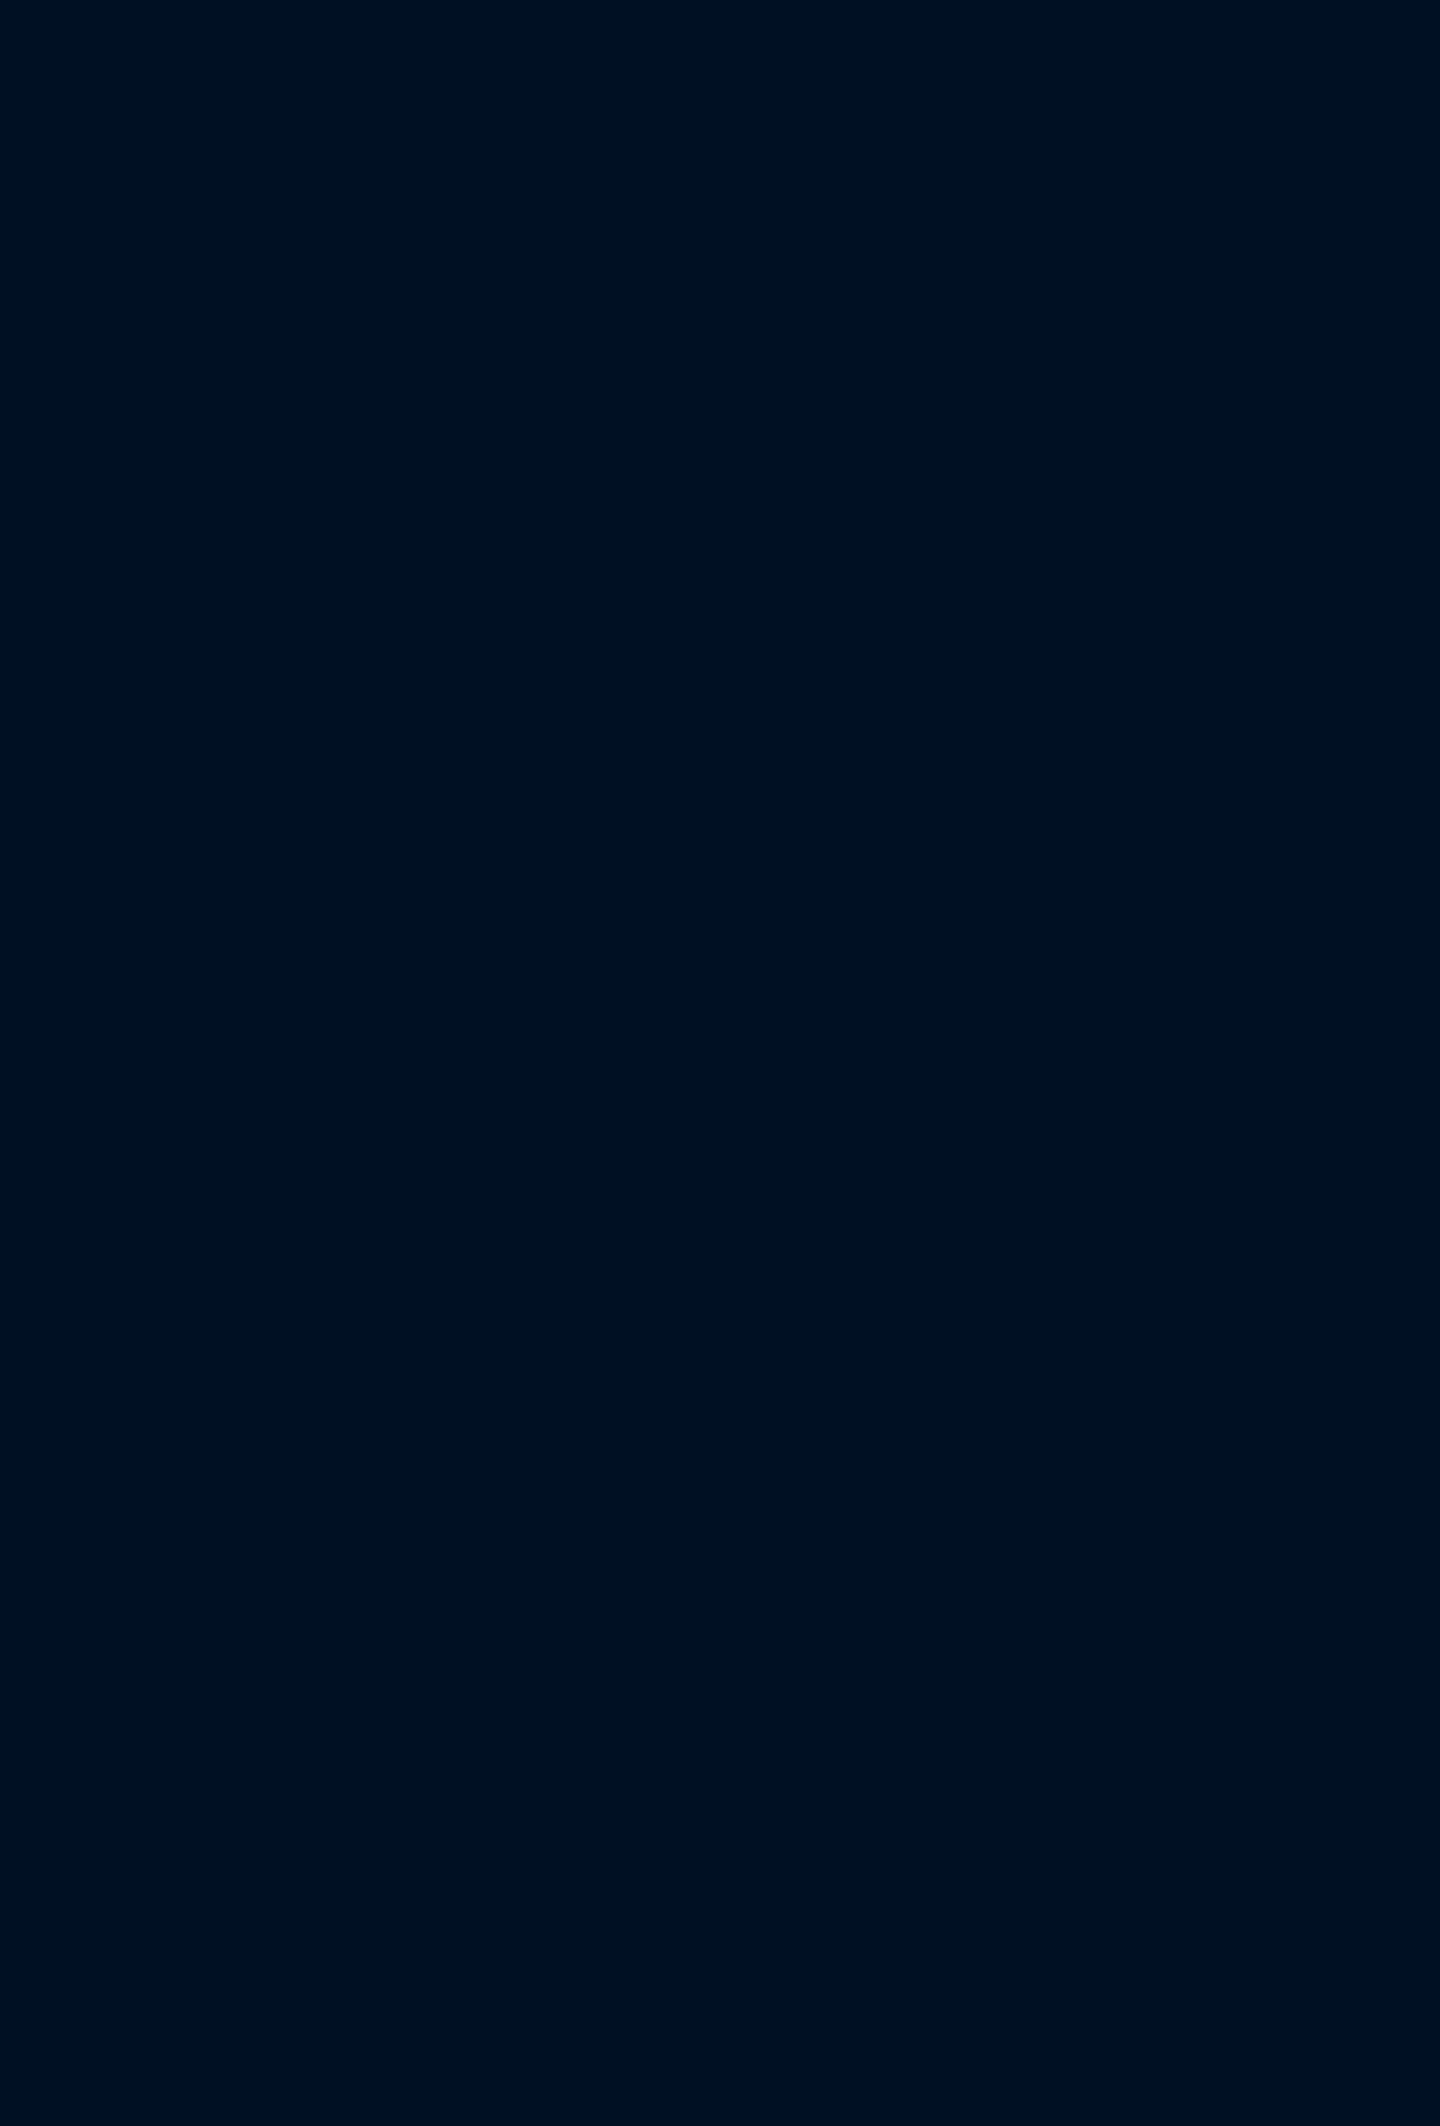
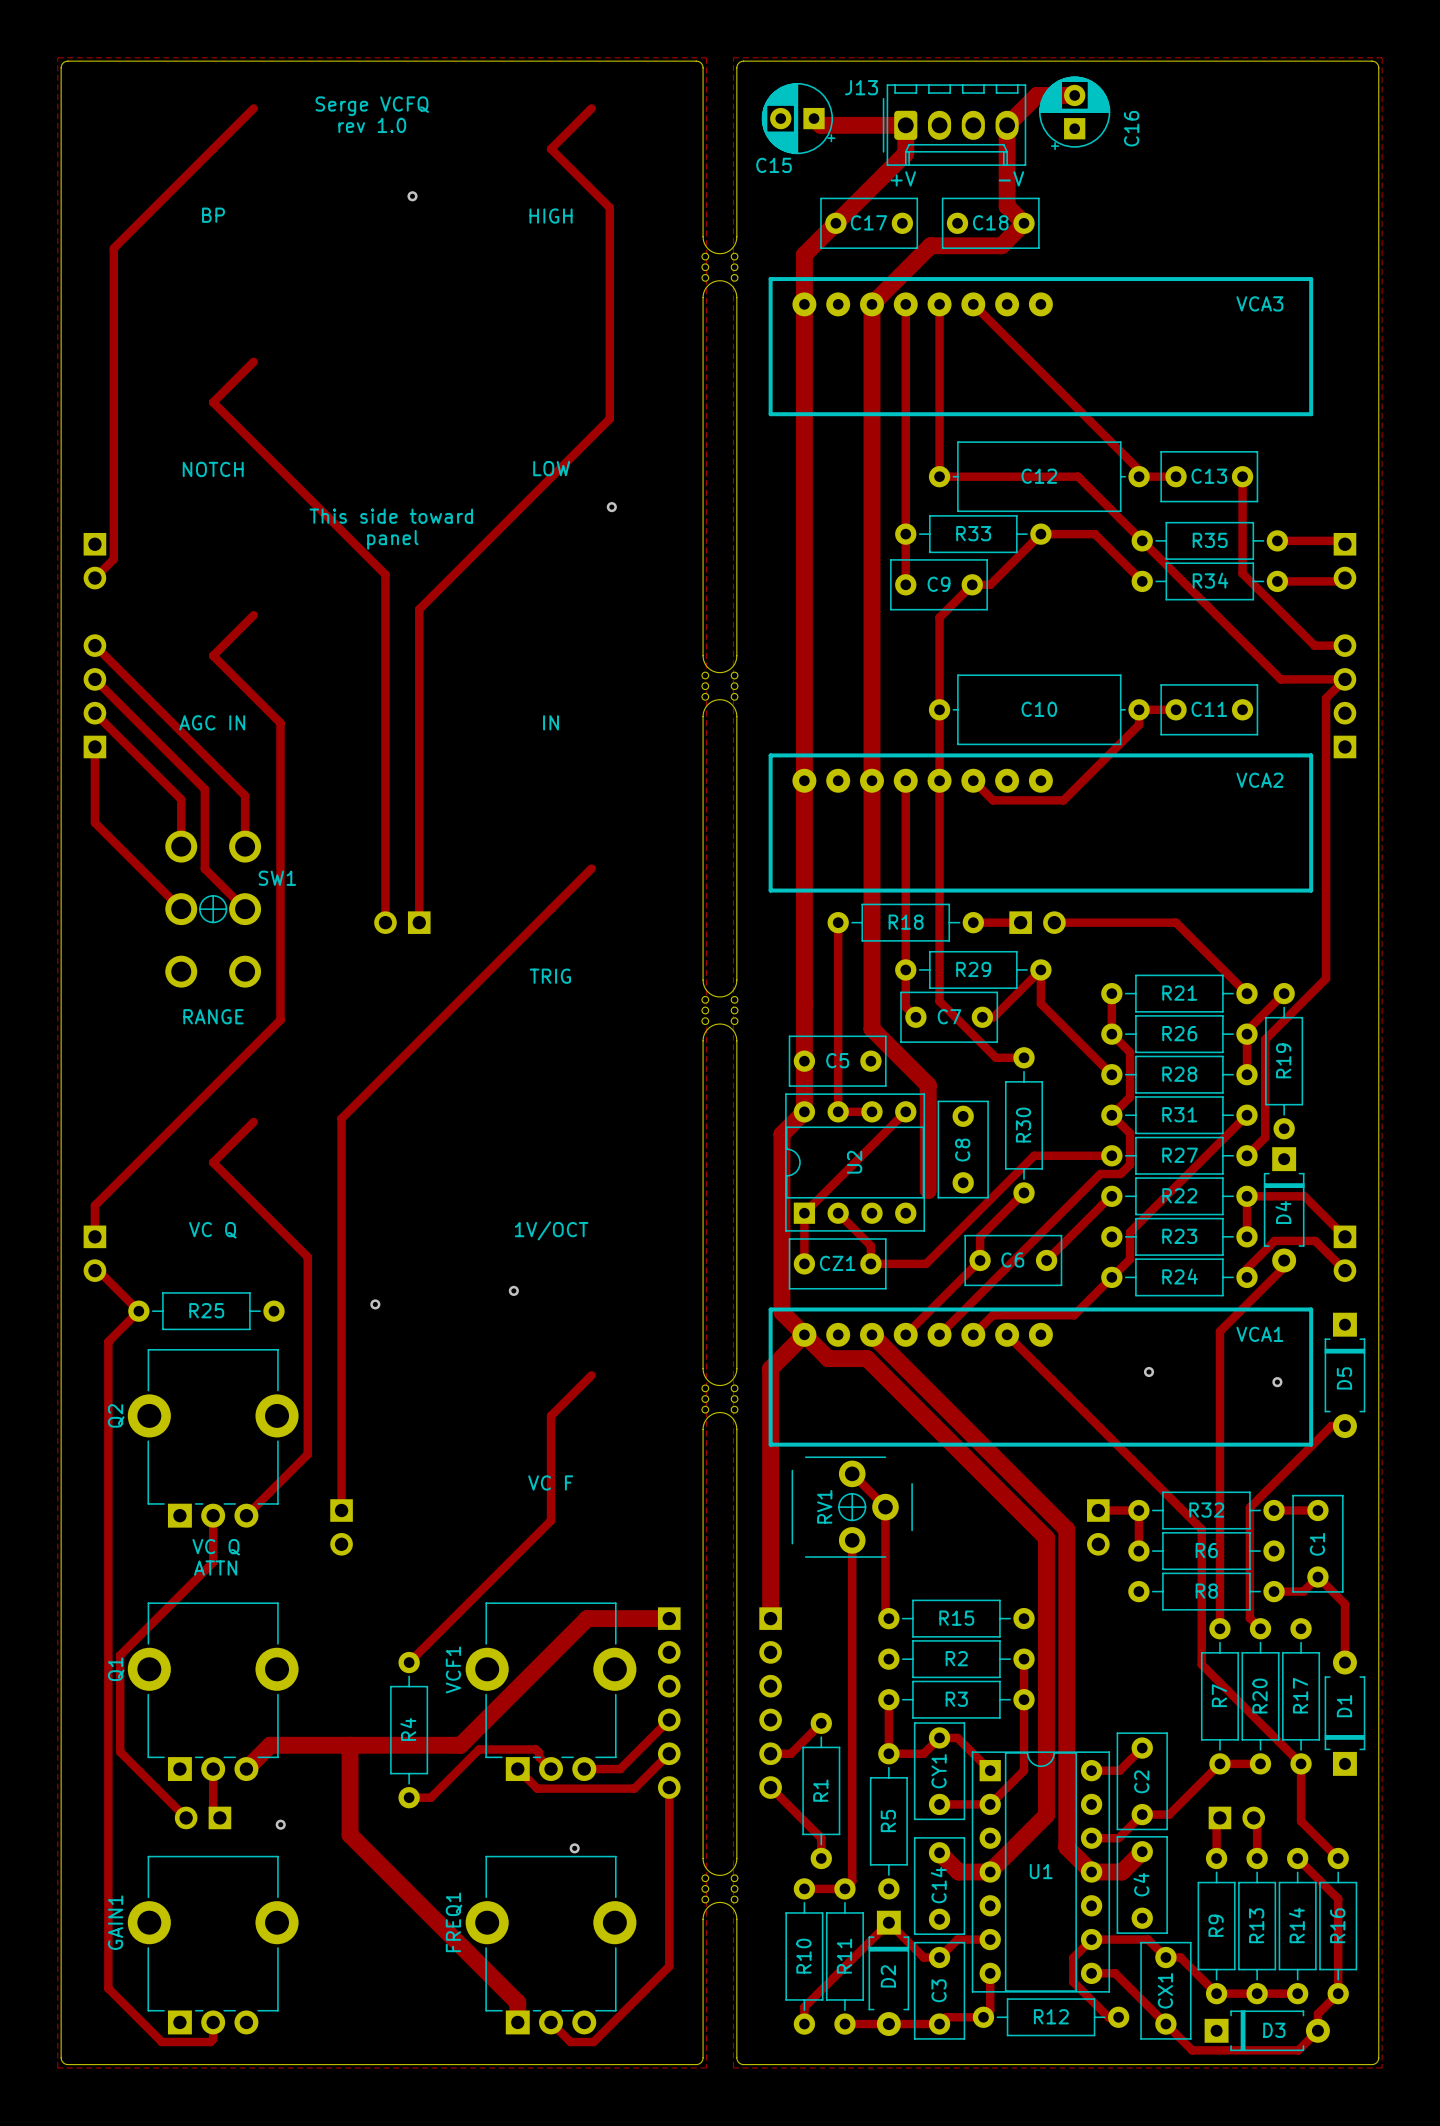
zone outline: none -> (57, 57) (706, 57) (706, 2067) (57, 2067) (57, 57)
zone outline: none -> (733, 57) (733, 2067) (1382, 2067) (1382, 57) (733, 57)
board edge: none -> (67, 61) (698, 61) (703, 67) (703, 239) (708, 248) (719, 253) (731, 248) (736, 239) (736, 67) (741, 61) (1371, 61) (1377, 64) (1378, 2057) (1375, 2063) (741, 2064) (736, 2057) (736, 1917) (731, 1907) (719, 1902) (708, 1907) (703, 1917) (703, 2057) (698, 2064) (67, 2064) (62, 2061) (61, 67) (63, 63) (67, 61)
track: none -> (1074, 95) (1036, 95) (1007, 125) (1007, 206) (1024, 223) (1001, 245) (930, 245) (871, 304) (871, 1028) (928, 1085) (928, 1190)
text: none -> Serge VCFQ (372, 106)
track: none -> (253, 108) (113, 248) (113, 559) (94, 578)
track: none -> (591, 108) (551, 148) (609, 207) (609, 418) (419, 609) (419, 922)
C16: none -> (1074, 113)
C15: none -> (798, 118)
track: none -> (814, 118) (820, 125) (905, 125) (905, 153) (804, 254) (804, 1111) (781, 1134) (781, 1312) (828, 1358) (867, 1358) (1046, 1537) (1046, 1815) (990, 1872) (958, 1872) (939, 1852)
text: none -> rev 1.0 (372, 125)
J13: none -> (954, 125)
text: none -> +V (903, 178)
text: none -> -V (1011, 178)
via: none -> (412, 196)
text: none -> BP (213, 215)
text: none -> HIGH (551, 216)
C17: none -> (869, 223)
C18: none -> (990, 223)
part: none -> (719, 267)
board edge: none -> (703, 297) (703, 655) (708, 667) (719, 672) (731, 667) (736, 655) (736, 297) (731, 285) (719, 280) (708, 285) (703, 297)
track: none -> (905, 304) (905, 584)
track: none -> (939, 304) (939, 476) (1078, 476) (1280, 679) (1344, 679) (1326, 698) (1326, 978) (1265, 1039) (1265, 1137) (1246, 1155)
track: none -> (973, 304) (1139, 470) (1139, 476) (1176, 476)
VCA3: none -> (1040, 346)
track: none -> (253, 361) (213, 402) (385, 574) (385, 922)
text: none -> LOW (551, 468)
text: none -> NOTCH (213, 469)
C12: none -> (1039, 476)
C13: none -> (1209, 476)
track: none -> (1242, 476) (1242, 573) (1314, 645) (1344, 645)
via: none -> (611, 507)
text: none -> This side toward (391, 516)
R33: none -> (973, 534)
text: none -> panel (392, 539)
R35: none -> (1209, 540)
track: none -> (1277, 540) (1341, 540) (1344, 544)
part: none -> (94, 561)
part: none -> (1344, 561)
track: none -> (1344, 578) (1341, 581) (1277, 581)
track: none -> (1142, 581) (1094, 534) (1040, 534) (990, 584) (972, 584) (939, 617) (939, 1001) (995, 1057) (1024, 1057)
R34: none -> (1209, 581)
C9: none -> (939, 584)
track: none -> (253, 615) (213, 655) (280, 723) (280, 1019) (94, 1205) (94, 1236)
track: none -> (94, 645) (245, 795) (245, 846)
track: none -> (94, 679) (204, 789) (204, 868) (245, 909)
part: none -> (719, 686)
part: none -> (94, 696)
part: none -> (1344, 696)
C10: none -> (1039, 709)
track: none -> (1176, 709) (1139, 709) (1139, 724) (1063, 800) (992, 800) (973, 780)
C11: none -> (1209, 709)
track: none -> (94, 713) (181, 799) (181, 846)
board edge: none -> (703, 716) (703, 980) (708, 992) (719, 996) (731, 992) (736, 980) (736, 716) (731, 704) (719, 699) (708, 704) (703, 716)
text: none -> AGC IN (212, 722)
text: none -> IN (551, 722)
track: none -> (94, 746) (94, 822) (181, 909)
track: none -> (905, 780) (905, 1007) (915, 1017)
VCA2: none -> (1040, 822)
track: none -> (591, 868) (341, 1118) (341, 1510)
SW1: none -> (213, 909)
part: none -> (402, 922)
track: none -> (838, 922) (838, 1111) (871, 1111)
R18: none -> (905, 922)
track: none -> (973, 922) (1020, 922)
part: none -> (1037, 922)
track: none -> (1054, 922) (1176, 922) (1246, 993)
R29: none -> (973, 969)
text: none -> TRIG (550, 976)
track: none -> (1111, 993) (1111, 1034) (1130, 1052) (1130, 1096) (1111, 1115) (1130, 1133) (1130, 1164) (1120, 1174) (1100, 1174) (939, 1334)
R21: none -> (1179, 993)
track: none -> (1284, 993) (1246, 1030) (1246, 1074)
part: none -> (719, 1010)
text: none -> RANGE (213, 1016)
C7: none -> (949, 1017)
track: none -> (982, 1017) (993, 1017) (1040, 969) (1040, 1003) (1111, 1074)
R26: none -> (1179, 1034)
board edge: none -> (703, 1040) (703, 1368) (708, 1380) (719, 1385) (731, 1380) (736, 1368) (736, 1040) (731, 1028) (719, 1024) (708, 1028) (703, 1040)
C5: none -> (837, 1061)
R19: none -> (1284, 1061)
R28: none -> (1179, 1074)
track: none -> (905, 1111) (804, 1213) (804, 1263)
R31: none -> (1179, 1115)
track: none -> (1246, 1115) (1130, 1232) (1130, 1259) (1073, 1315) (992, 1315) (973, 1334)
track: none -> (253, 1121) (213, 1162) (307, 1257) (307, 1454) (246, 1515)
R30: none -> (1024, 1125)
C8: none -> (963, 1149)
track: none -> (1111, 1155) (1034, 1155) (926, 1263) (870, 1263) (870, 1245) (838, 1213)
R27: none -> (1179, 1155)
U2: none -> (855, 1162)
track: none -> (1024, 1192) (980, 1236) (980, 1260) (905, 1334)
track: none -> (1111, 1196) (1046, 1260)
R22: none -> (1179, 1196)
D4: none -> (1284, 1209)
text: none -> VC Q (212, 1230)
text: none -> 1V/OCT (551, 1230)
R23: none -> (1179, 1236)
track: none -> (1246, 1236) (1246, 1196) (1304, 1196) (1344, 1236)
part: none -> (94, 1253)
part: none -> (1344, 1253)
C6: none -> (1013, 1260)
track: none -> (1284, 1260) (1284, 1267) (1219, 1331) (1219, 1628)
CZ1: none -> (837, 1263)
track: none -> (94, 1270) (98, 1270) (138, 1311) (108, 1341) (108, 1988) (161, 2042) (210, 2042) (213, 2039) (213, 2022)
track: none -> (1344, 1270) (1315, 1240) (1274, 1240) (1246, 1268) (1246, 1277)
R24: none -> (1179, 1277)
via: none -> (513, 1290)
via: none -> (375, 1304)
R25: none -> (206, 1311)
track: none -> (804, 1334) (770, 1368) (770, 1618)
track: none -> (871, 1334) (1066, 1529) (1066, 1847) (1091, 1872) (1121, 1872) (1142, 1851)
track: none -> (1007, 1334) (1201, 1529) (1201, 1664) (1301, 1763) (1301, 1821) (1338, 1858)
via: none -> (1149, 1371)
track: none -> (591, 1375) (551, 1415) (551, 1520) (409, 1662)
D5: none -> (1344, 1375)
VCA1: none -> (1040, 1377)
via: none -> (1277, 1382)
part: none -> (719, 1399)
track: none -> (1344, 1426) (1331, 1426) (1249, 1507) (1249, 1618) (1260, 1628)
board edge: none -> (703, 1429) (703, 1858) (708, 1870) (719, 1875) (731, 1870) (736, 1858) (736, 1429) (731, 1417) (719, 1412) (708, 1417) (703, 1429)
Q2: none -> (213, 1438)
track: none -> (852, 1473) (885, 1507) (885, 1615) (888, 1618)
text: none -> VC F (550, 1482)
RV1: none -> (852, 1507)
track: none -> (1098, 1510) (1138, 1510) (1138, 1551)
R32: none -> (1206, 1510)
track: none -> (1274, 1510) (1317, 1510)
track: none -> (213, 1515) (213, 1562) (120, 1655) (120, 1751) (186, 1817)
part: none -> (341, 1527)
part: none -> (1098, 1527)
track: none -> (852, 1540) (852, 1881) (844, 1888) (804, 1888)
C1: none -> (1317, 1543)
text: none -> VC Q (216, 1547)
R6: none -> (1206, 1551)
text: none -> ATTN (215, 1568)
R8: none -> (1206, 1591)
track: none -> (1274, 1591) (1303, 1591) (1317, 1577) (1344, 1604) (1344, 1662)
track: none -> (669, 1618) (587, 1618) (460, 1745) (270, 1745) (246, 1769)
R15: none -> (956, 1618)
R2: none -> (956, 1659)
track: none -> (1024, 1659) (1024, 1770) (990, 1804) (939, 1804)
Q1: none -> (213, 1691)
VCF1: none -> (551, 1691)
R7: none -> (1219, 1696)
R20: none -> (1260, 1696)
R17: none -> (1301, 1696)
track: none -> (888, 1699) (888, 1753) (923, 1753) (939, 1737) (957, 1737) (990, 1770)
R3: none -> (956, 1699)
part: none -> (669, 1703)
part: none -> (770, 1703)
D1: none -> (1344, 1713)
track: none -> (669, 1719) (620, 1769) (584, 1769)
track: none -> (821, 1723) (790, 1753) (770, 1753)
R4: none -> (409, 1730)
track: none -> (350, 1745) (350, 1834) (517, 2002) (517, 2022)
track: none -> (1142, 1748) (1119, 1770) (1091, 1770)
track: none -> (669, 1753) (634, 1788) (537, 1788) (517, 1769)
track: none -> (1260, 1763) (1219, 1763) (1169, 1814) (1142, 1814) (1118, 1838) (1091, 1838)
track: none -> (213, 1769) (213, 1811) (219, 1817)
track: none -> (551, 1769) (539, 1757) (539, 1752) (535, 1749) (479, 1749) (430, 1797) (409, 1797)
CY1: none -> (939, 1771)
C2: none -> (1142, 1781)
track: none -> (669, 1787) (669, 1966) (593, 2042) (570, 2042) (551, 2022)
track: none -> (770, 1787) (821, 1838) (821, 1858)
R1: none -> (821, 1790)
part: none -> (203, 1817)
track: none -> (1219, 1817) (1216, 1821) (1216, 1858)
part: none -> (1236, 1817)
track: none -> (1253, 1817) (1257, 1821) (1257, 1858)
R5: none -> (888, 1821)
via: none -> (280, 1824)
via: none -> (574, 1848)
track: none -> (1297, 1858) (1338, 1899) (1338, 1993) (1317, 2013) (1317, 2030) (1298, 2050) (1192, 2050) (1115, 1973) (1091, 1973)
U1: none -> (1040, 1872)
C4: none -> (1142, 1884)
C14: none -> (939, 1886)
part: none -> (719, 1888)
R9: none -> (1216, 1926)
R13: none -> (1257, 1926)
R14: none -> (1297, 1926)
R16: none -> (1338, 1926)
track: none -> (990, 1939) (957, 1939) (939, 1957) (923, 1957) (888, 1922) (804, 2007) (804, 2024)
GAIN1: none -> (213, 1945)
FREQ1: none -> (551, 1945)
R10: none -> (804, 1956)
R11: none -> (844, 1956)
D2: none -> (888, 1973)
track: none -> (990, 1973) (990, 2010) (983, 2017) (946, 2017) (939, 2024) (844, 2024)
C3: none -> (939, 1990)
CX1: none -> (1165, 1990)
track: none -> (1297, 1993) (1216, 1993) (1180, 1957) (1165, 1957) (1147, 1939) (1091, 1939) (1073, 1957) (1073, 1982) (1108, 2017) (1118, 2017)
R12: none -> (1051, 2017)
D3: none -> (1267, 2030)

